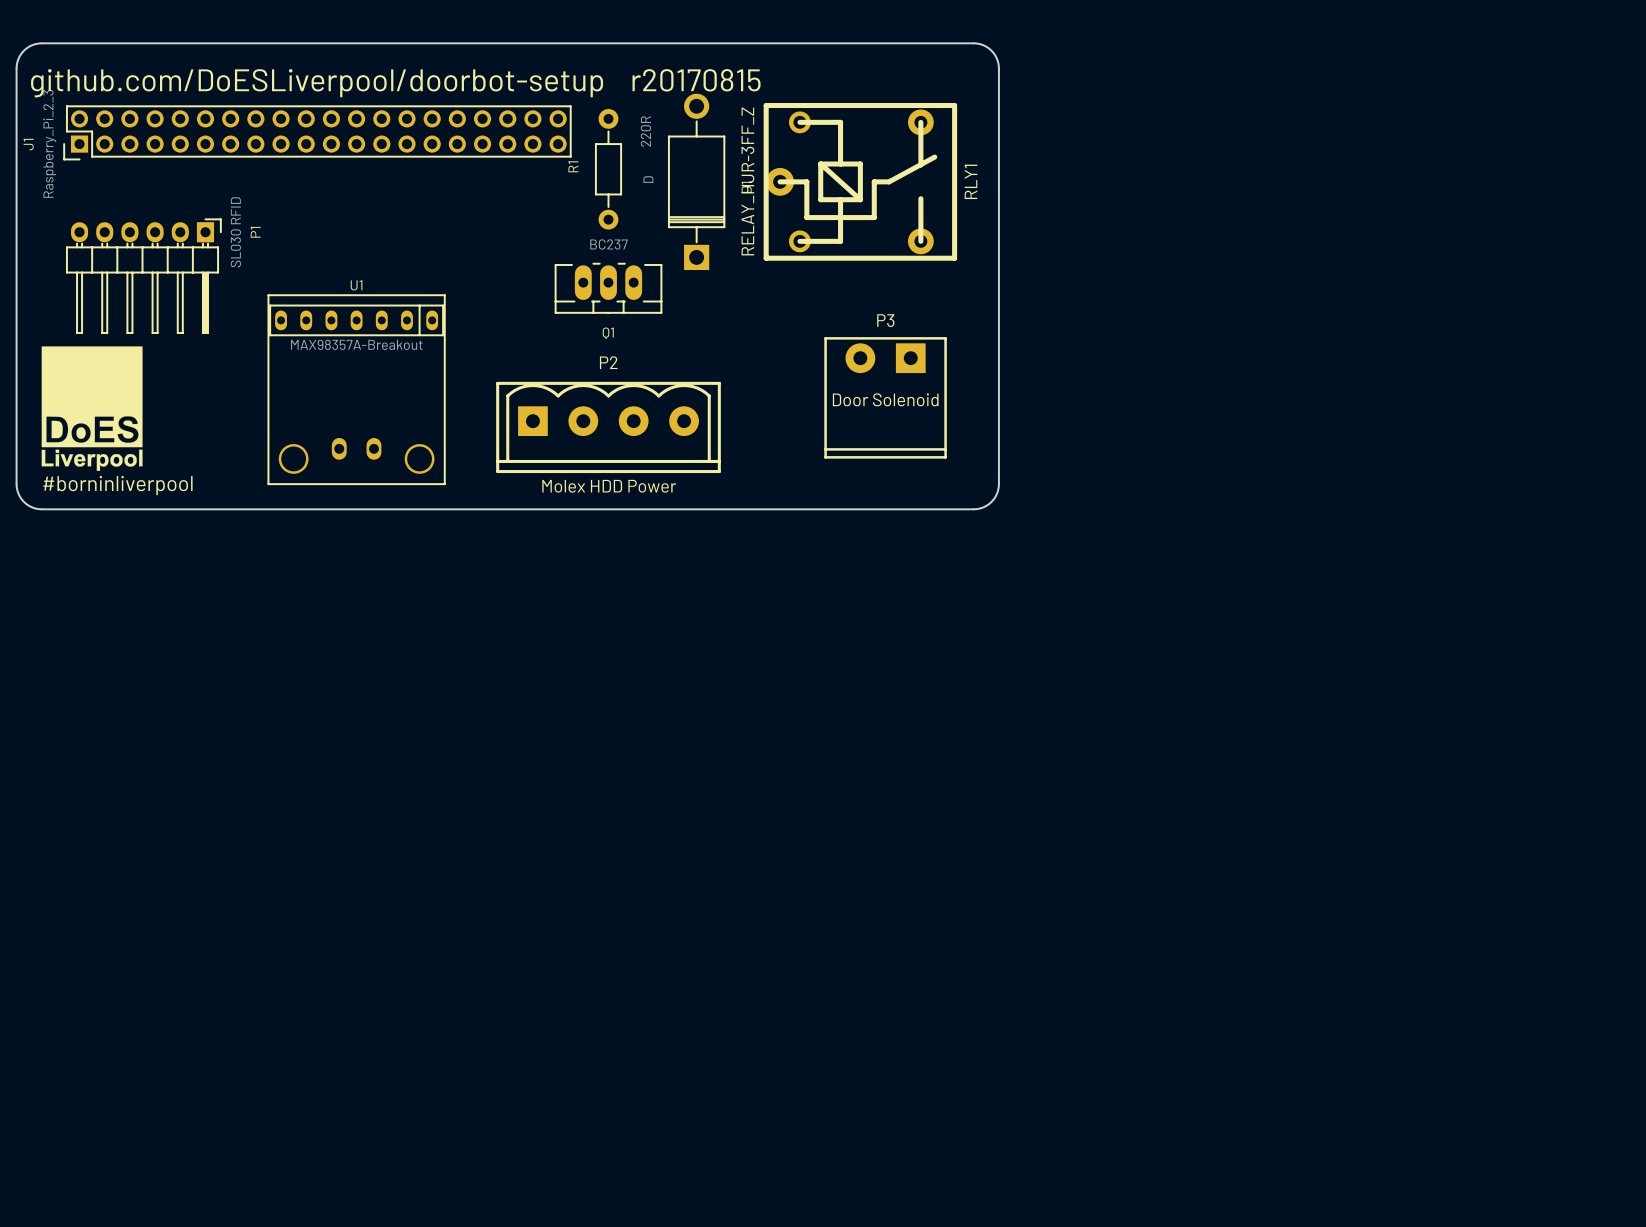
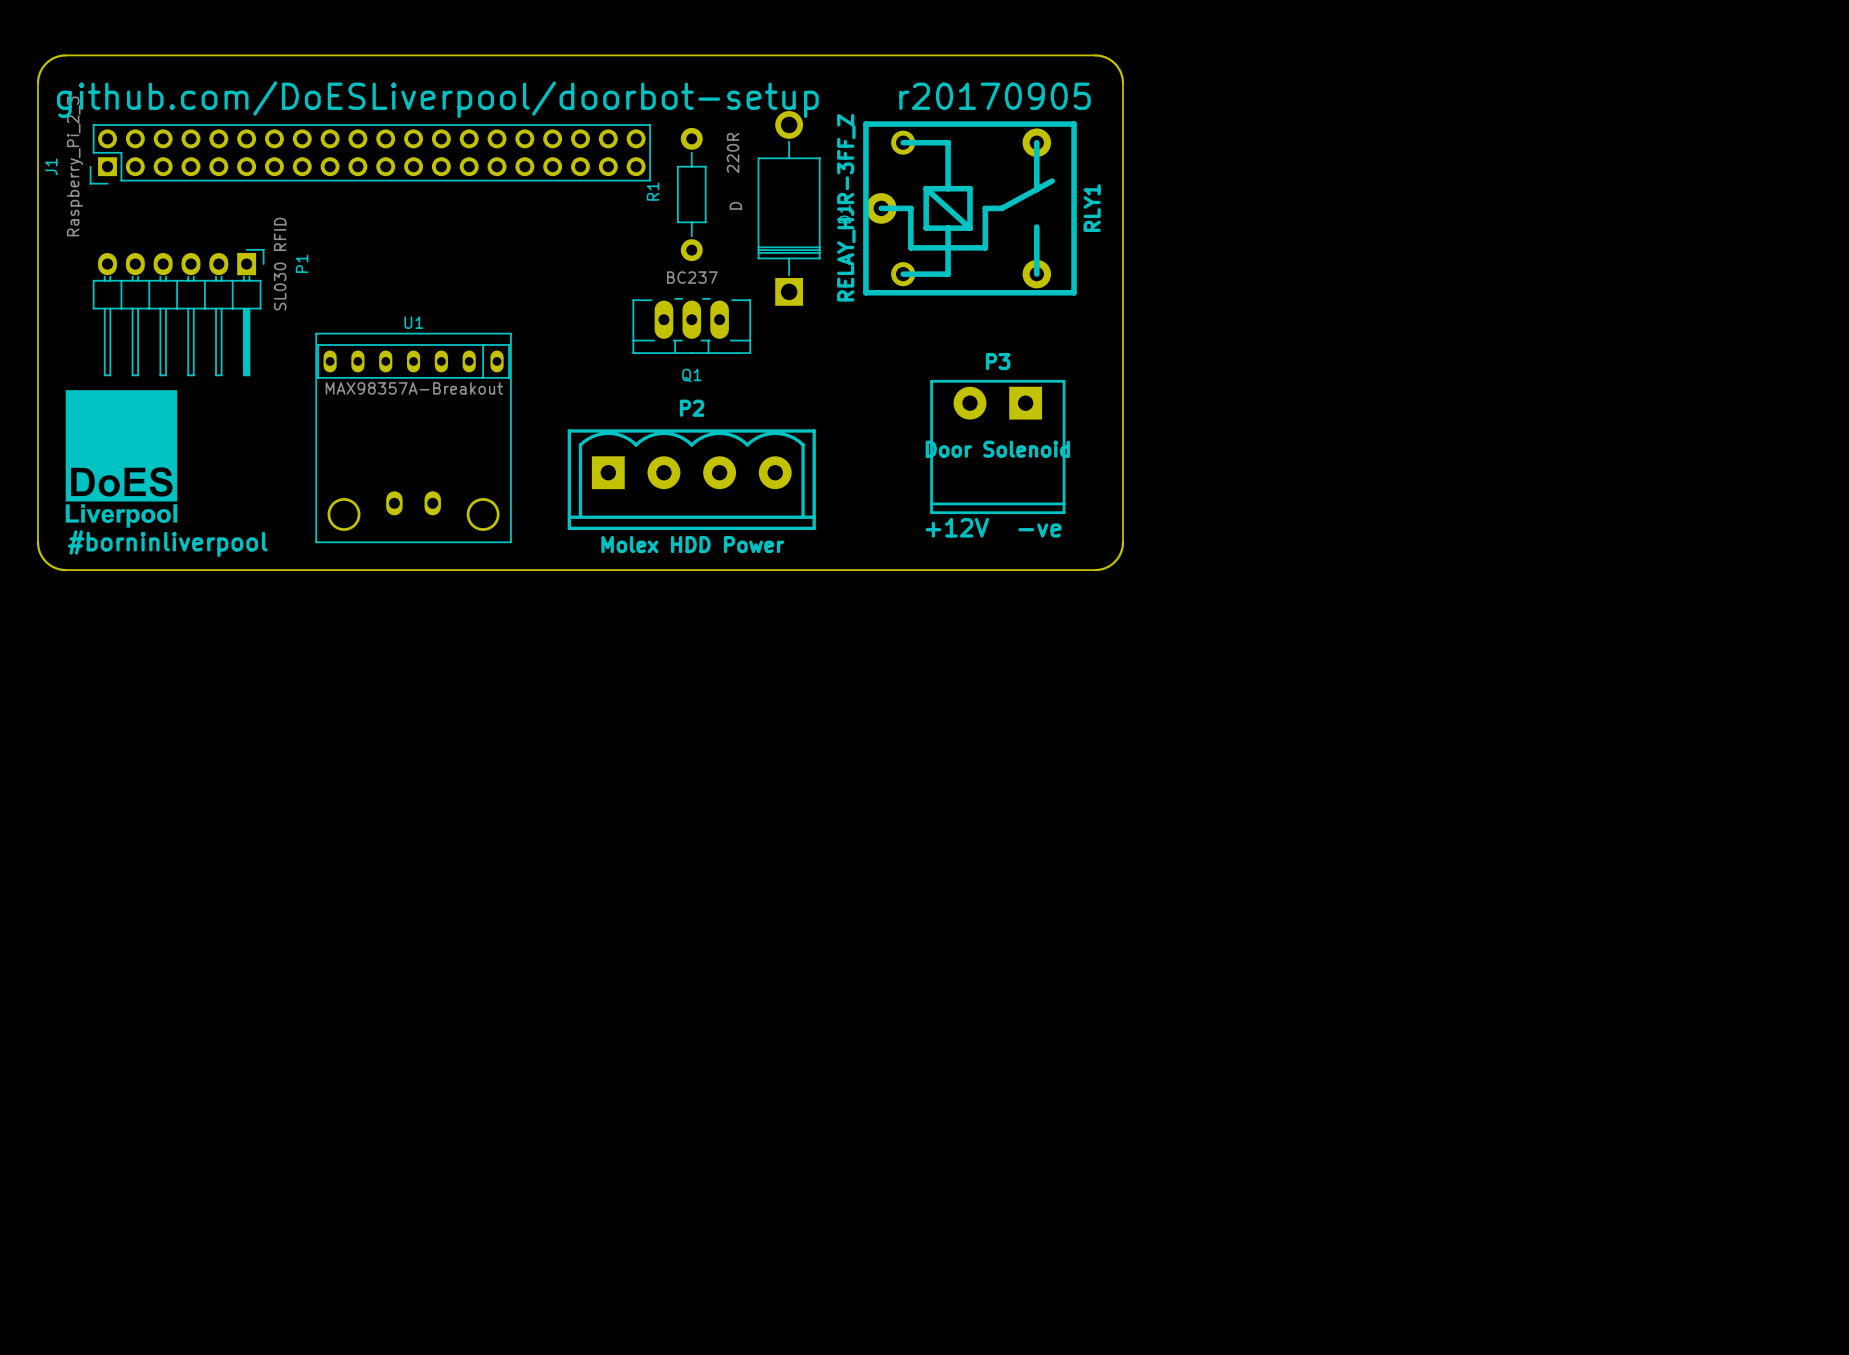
text: github.com/DoESLiverpool/doorbot-setup r20170815 (395, 83) -> github.com/DoESLiverpool/doorbot-setup r20170905 (573, 99)
text: none -> +12V (957, 527)
text: none -> -ve (1039, 530)

